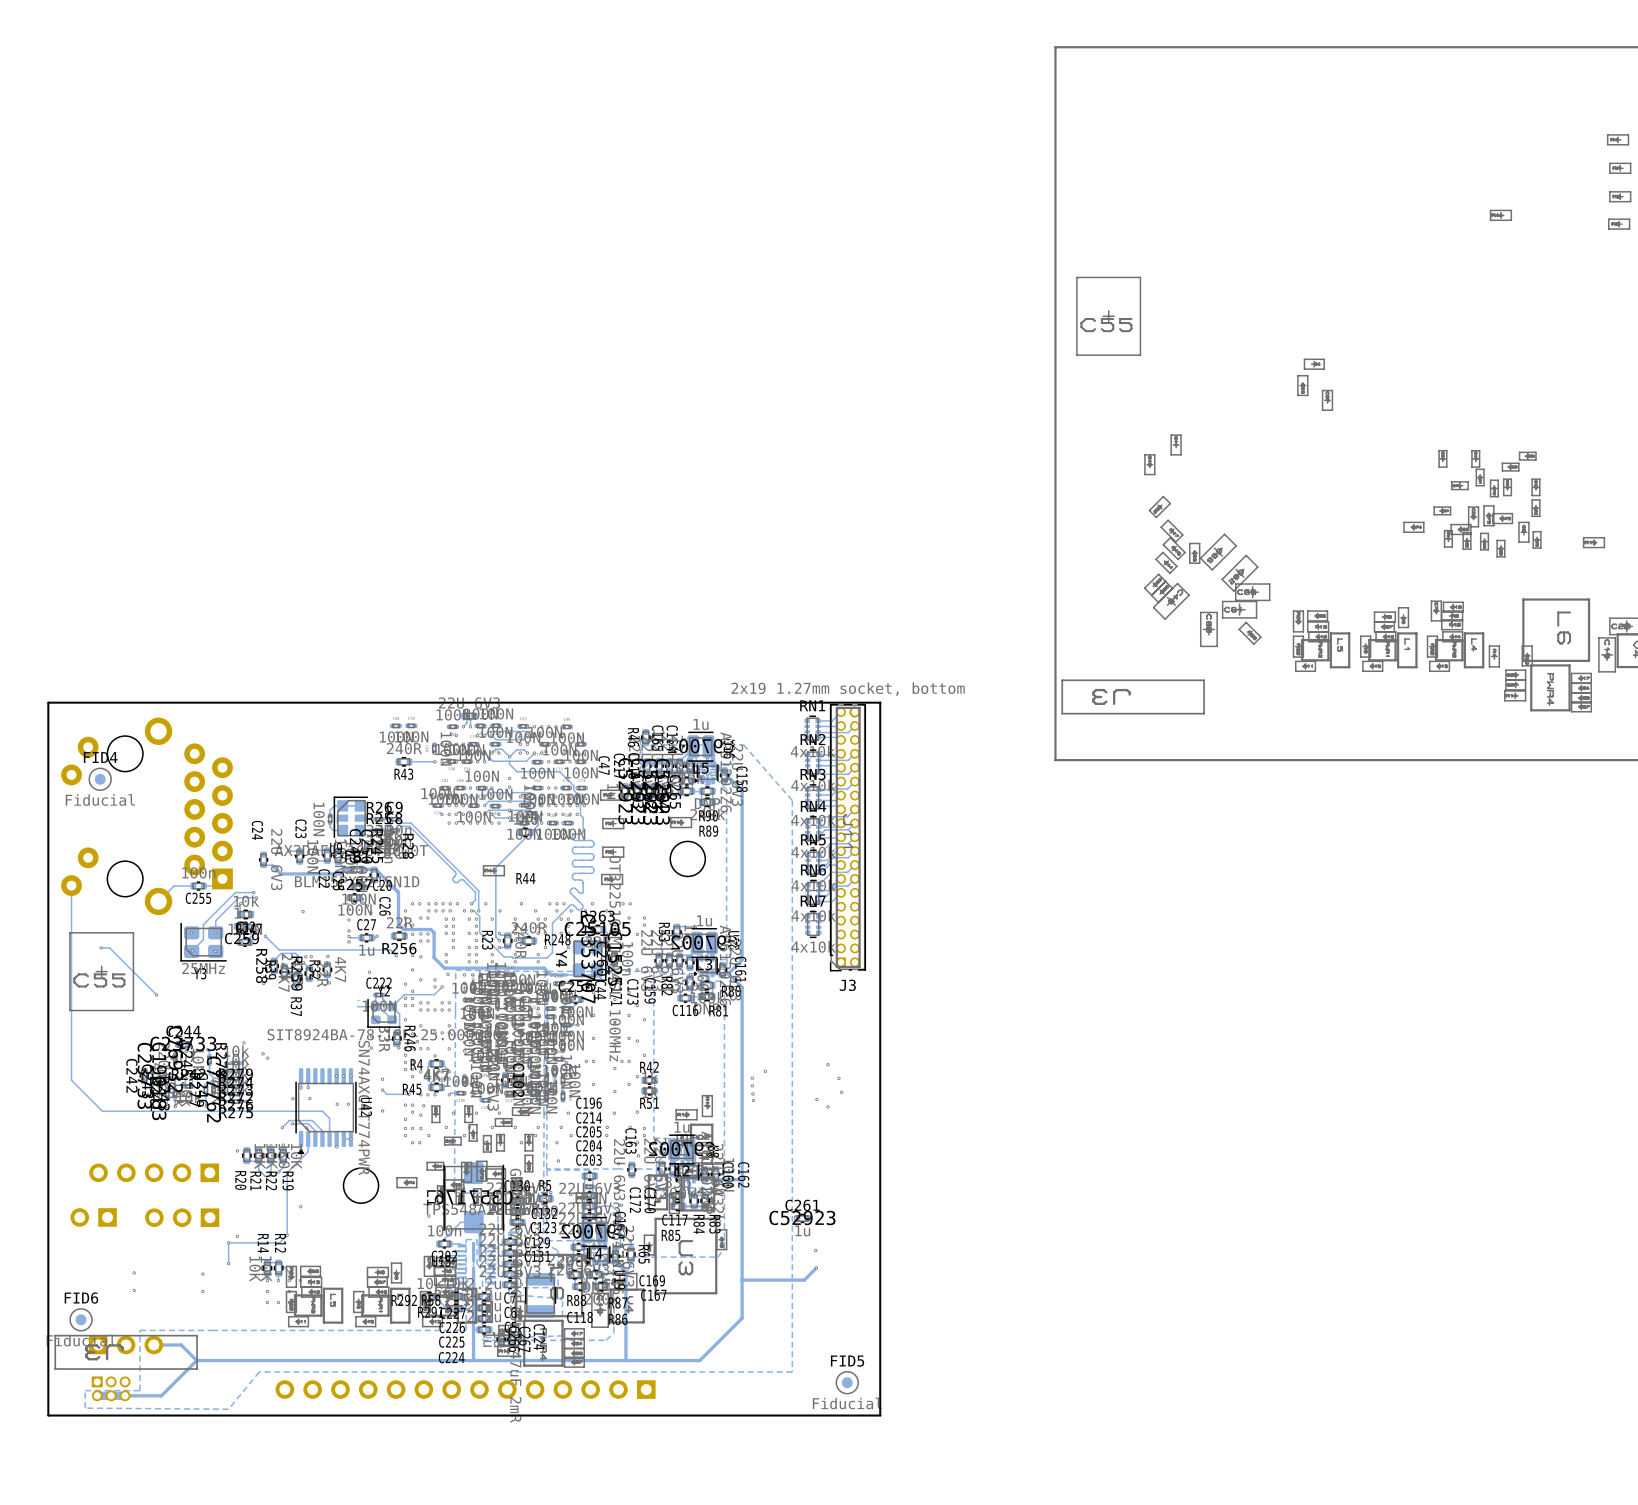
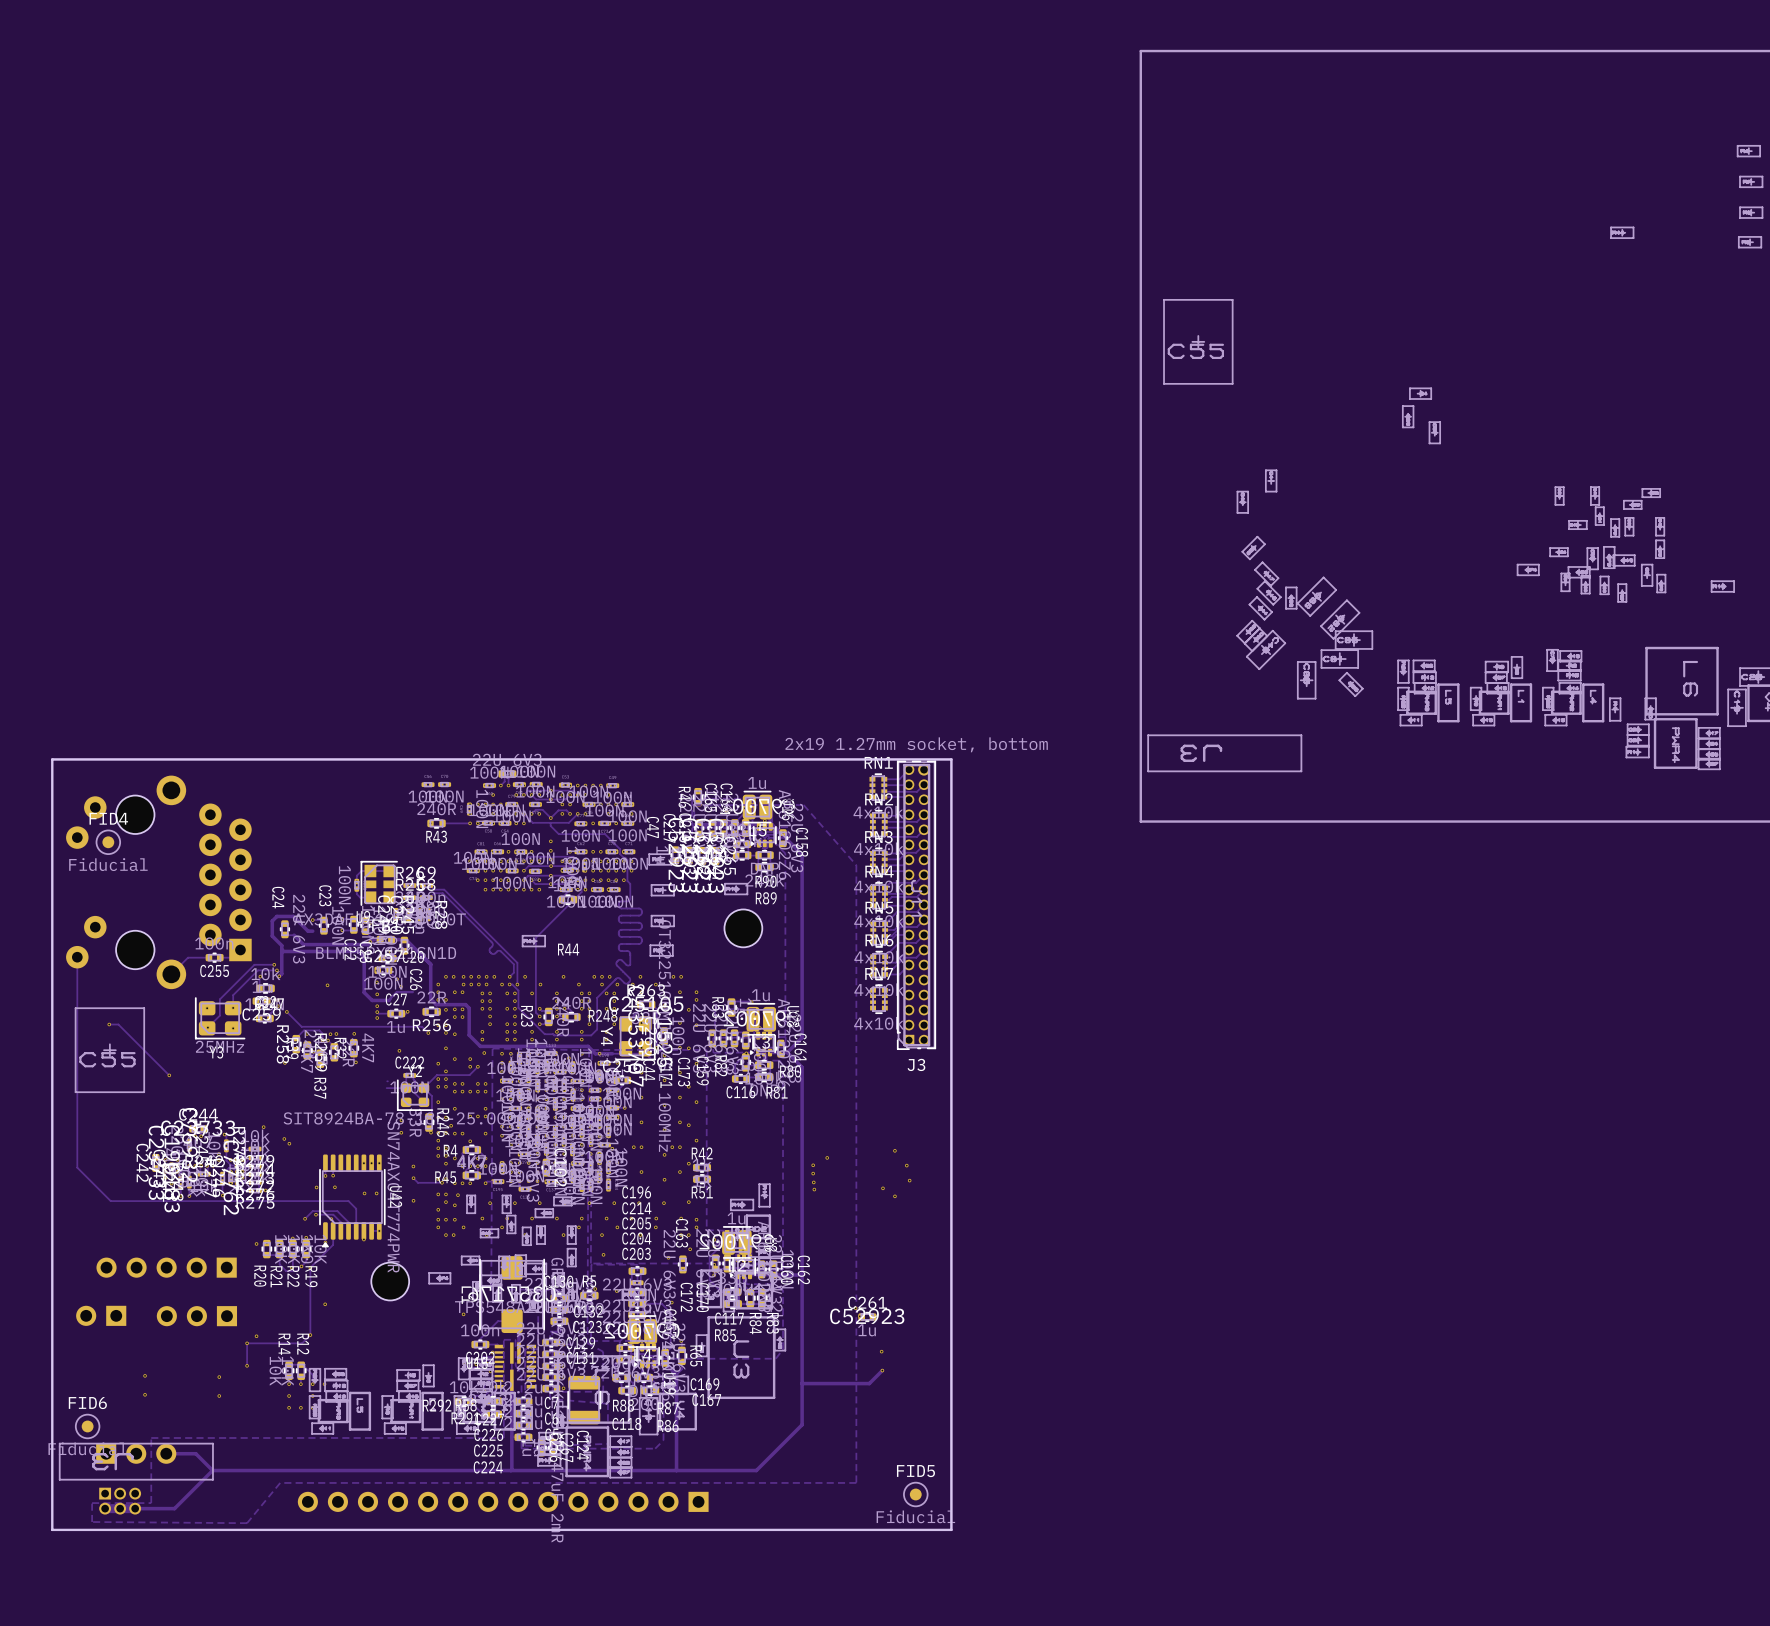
track: none -> (312, 931) (308, 931) (293, 916) (276, 916) (272, 921) (272, 936) (281, 945) (281, 973) (279, 976)
track: none -> (281, 949) (283, 951) (358, 951) (364, 957) (364, 992) (372, 1000) (389, 1000)
via: none -> (279, 976)
track: none -> (412, 992) (396, 992) (390, 999)

